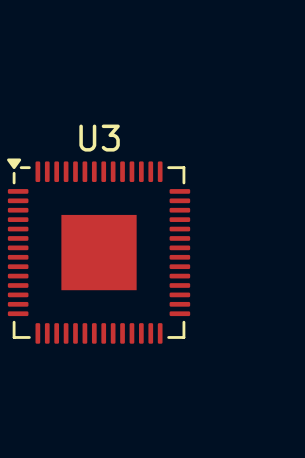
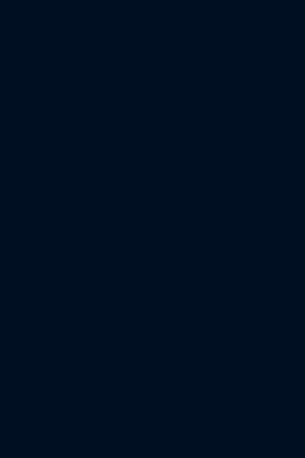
U3: (98, 251) -> none

